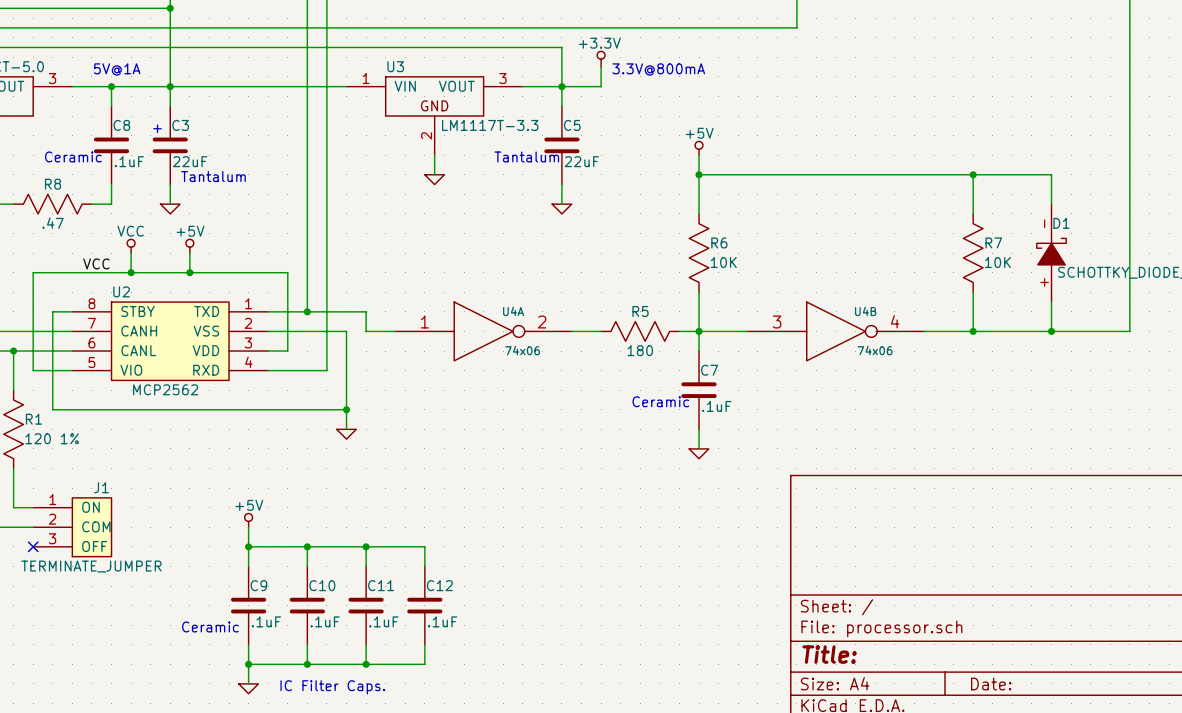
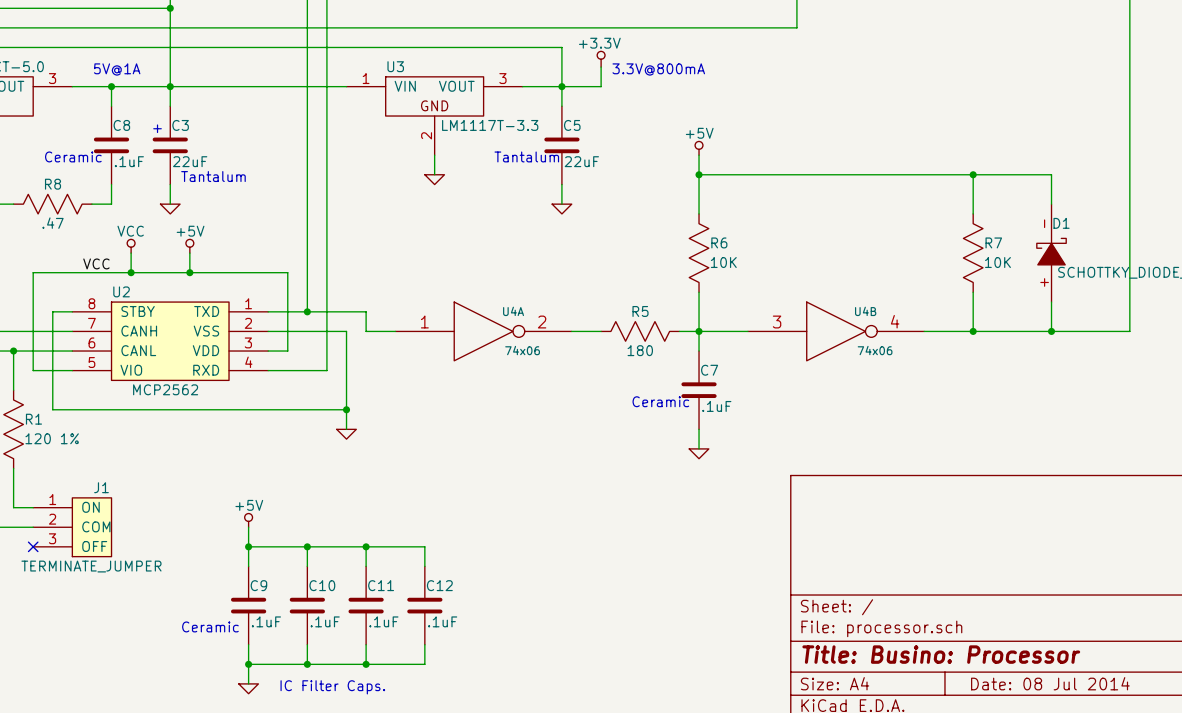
title block: Title: (829, 654) -> Title: Busino: Processor (941, 654)
title block: Date: (991, 684) -> Date: 08 Jul 2014 (1050, 683)

